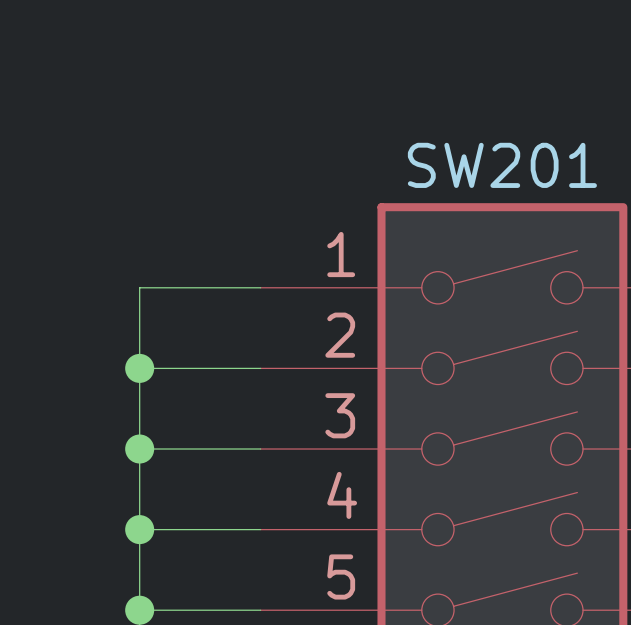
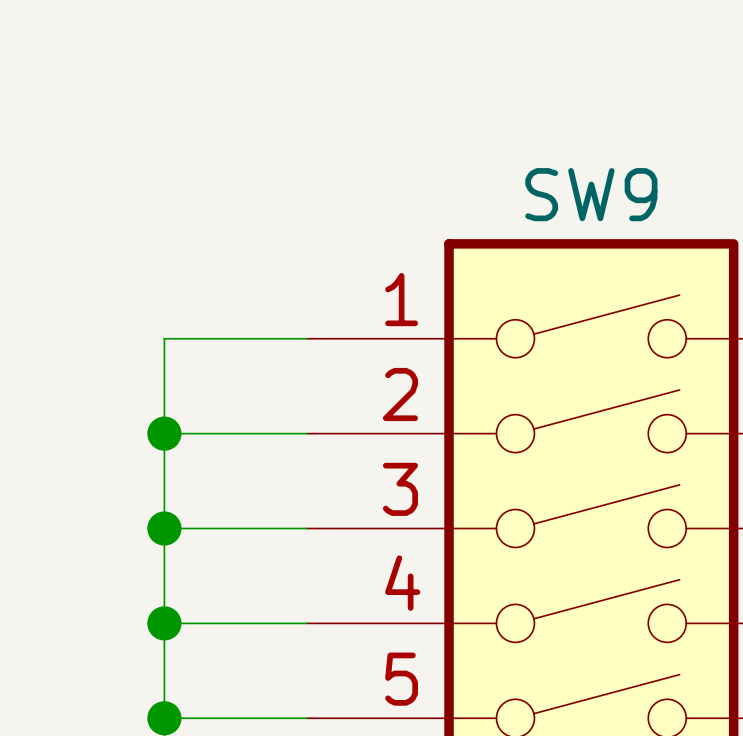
SW201 name: SW201 (502, 165) -> SW9 (591, 194)

